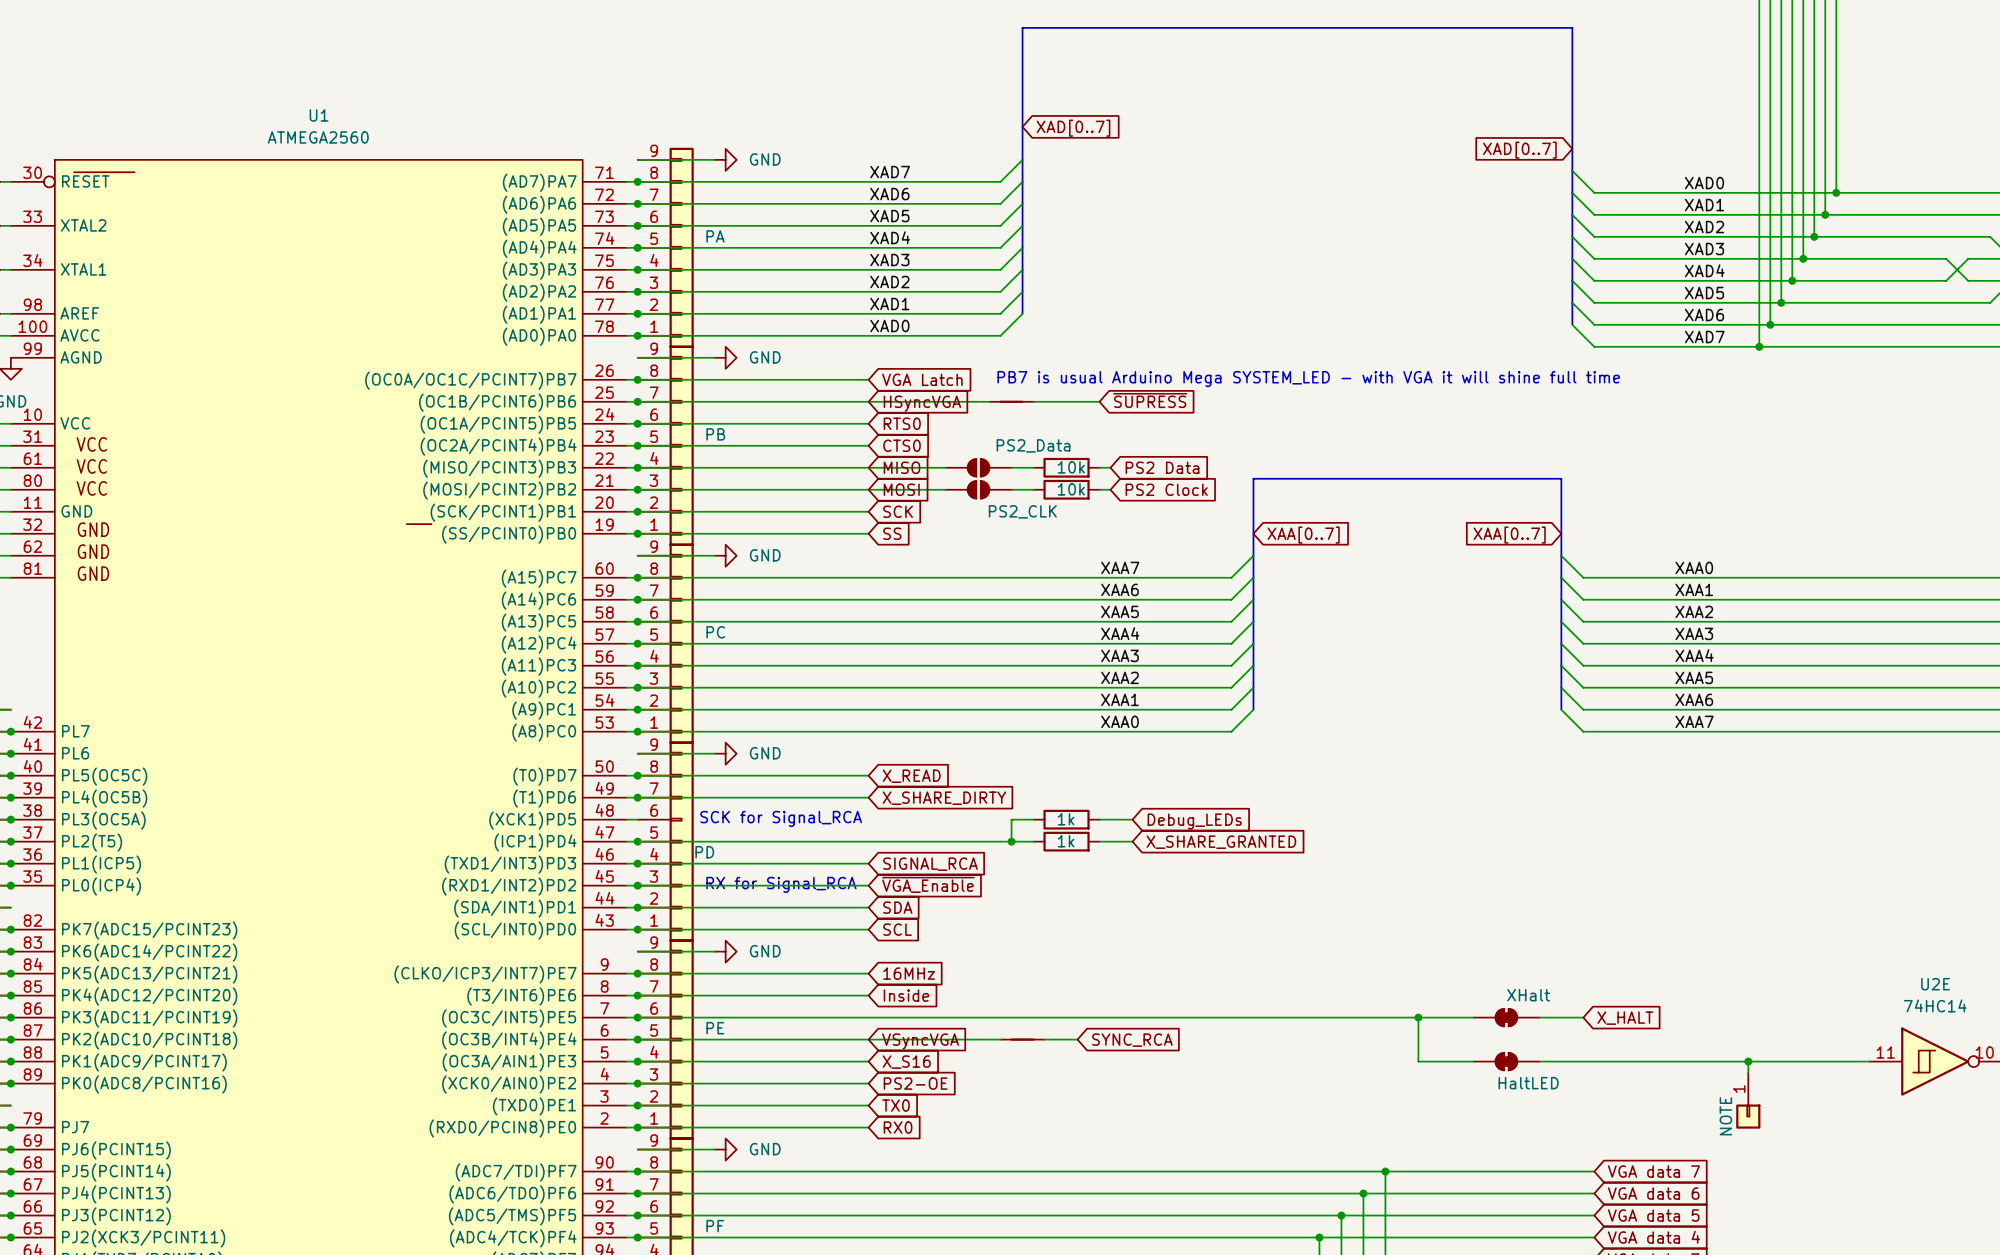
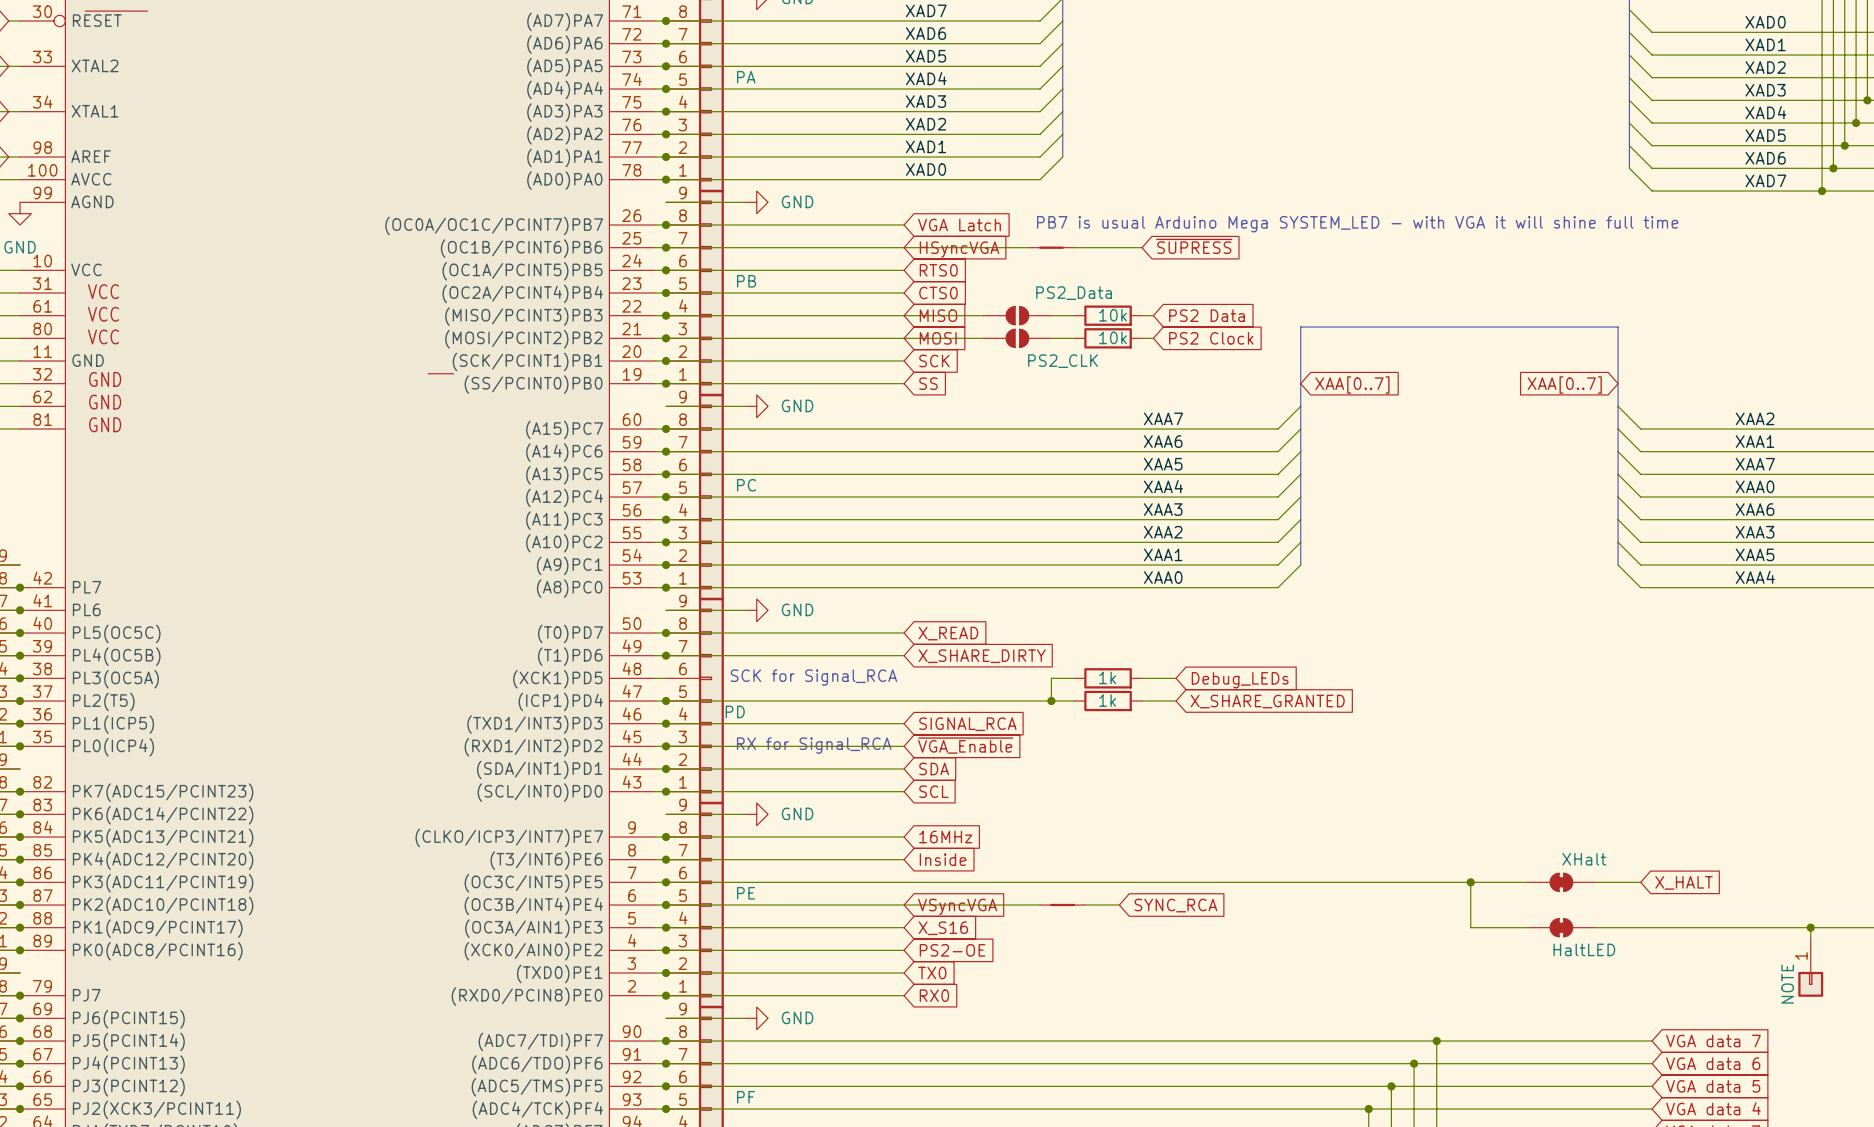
label: XAA0 (1694, 567) -> XAA2 (1755, 418)
label: XAA2 (1694, 611) -> XAA7 (1755, 464)
label: XAA3 (1694, 633) -> XAA0 (1755, 486)
label: XAA4 (1694, 655) -> XAA6 (1755, 509)
label: XAA5 (1694, 677) -> XAA3 (1755, 532)
label: XAA6 (1694, 699) -> XAA5 (1755, 554)
label: XAA7 (1694, 721) -> XAA4 (1755, 577)

